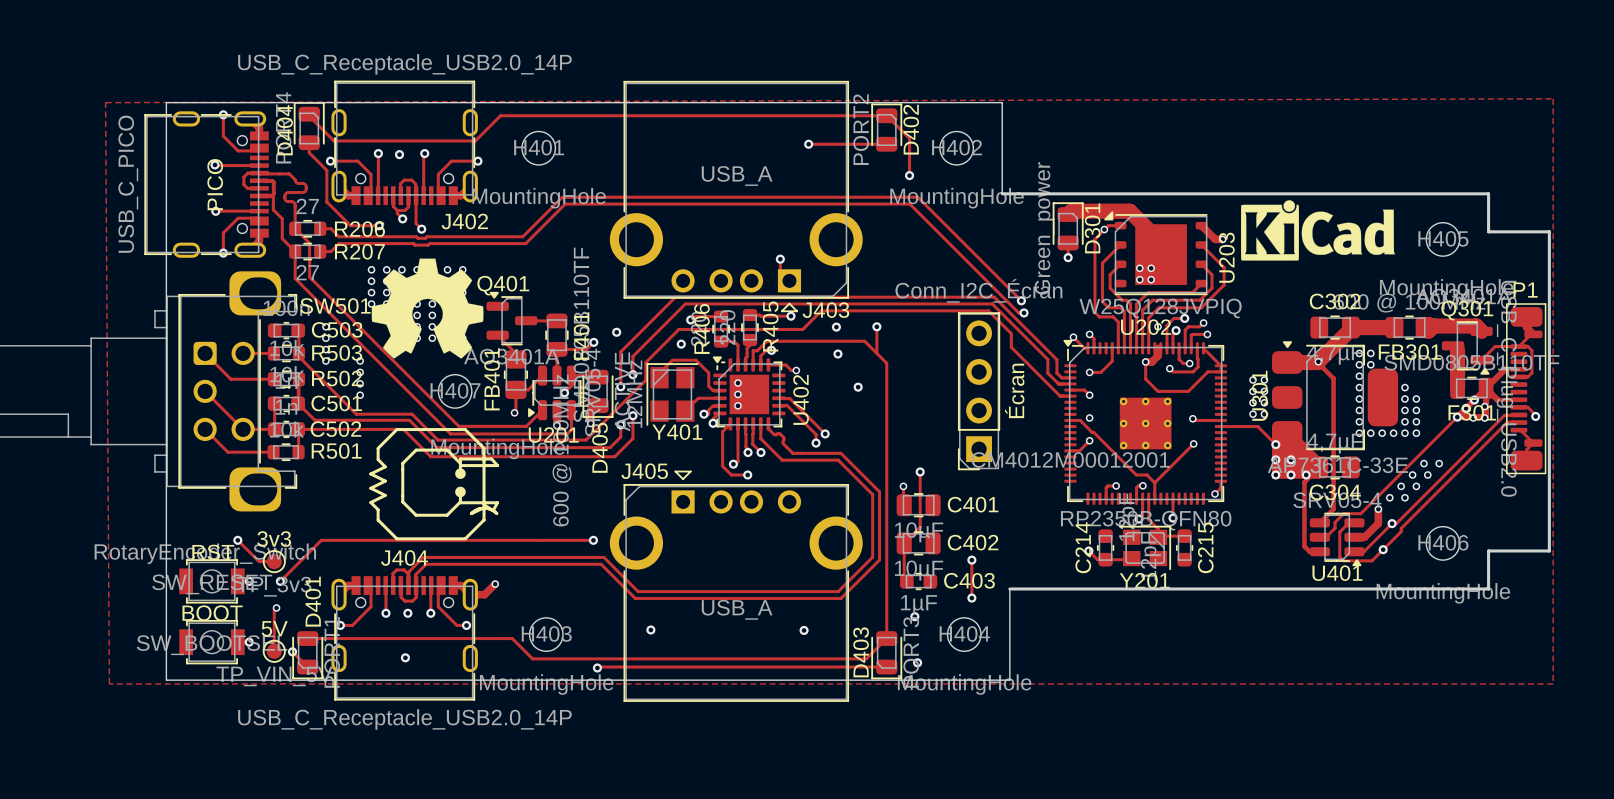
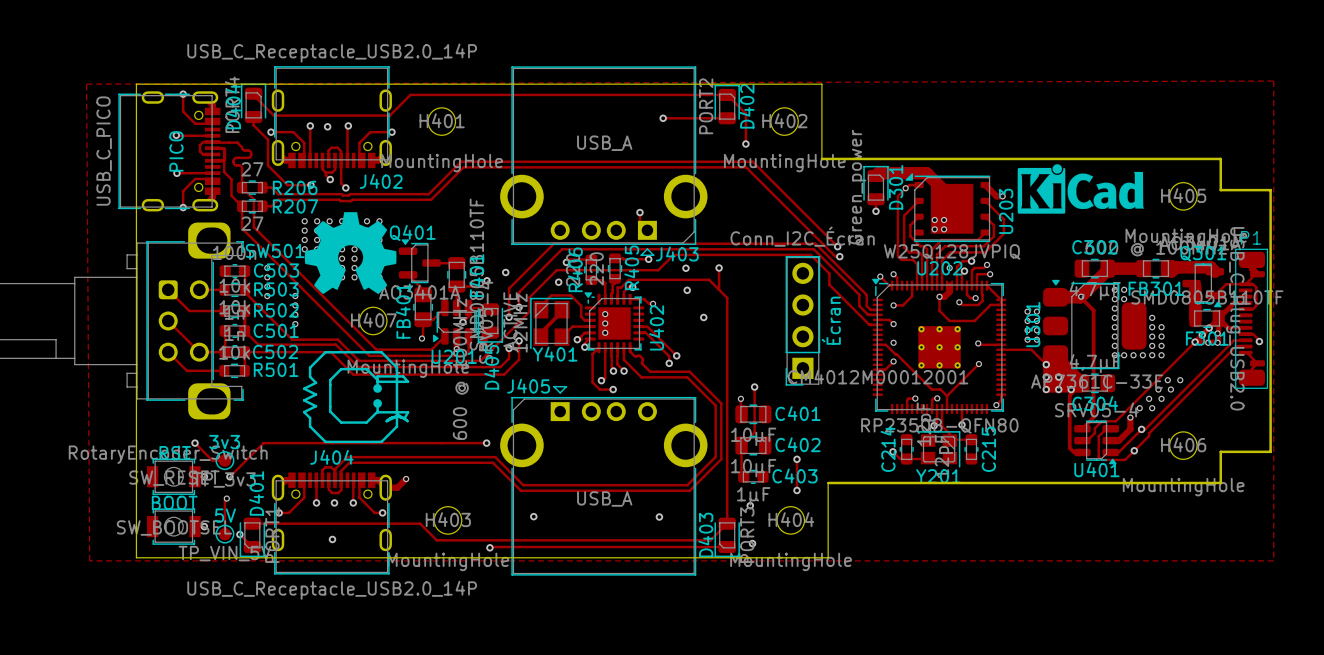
track: none -> (562, 309) (562, 314) (558, 314) (540, 332) (540, 337)

